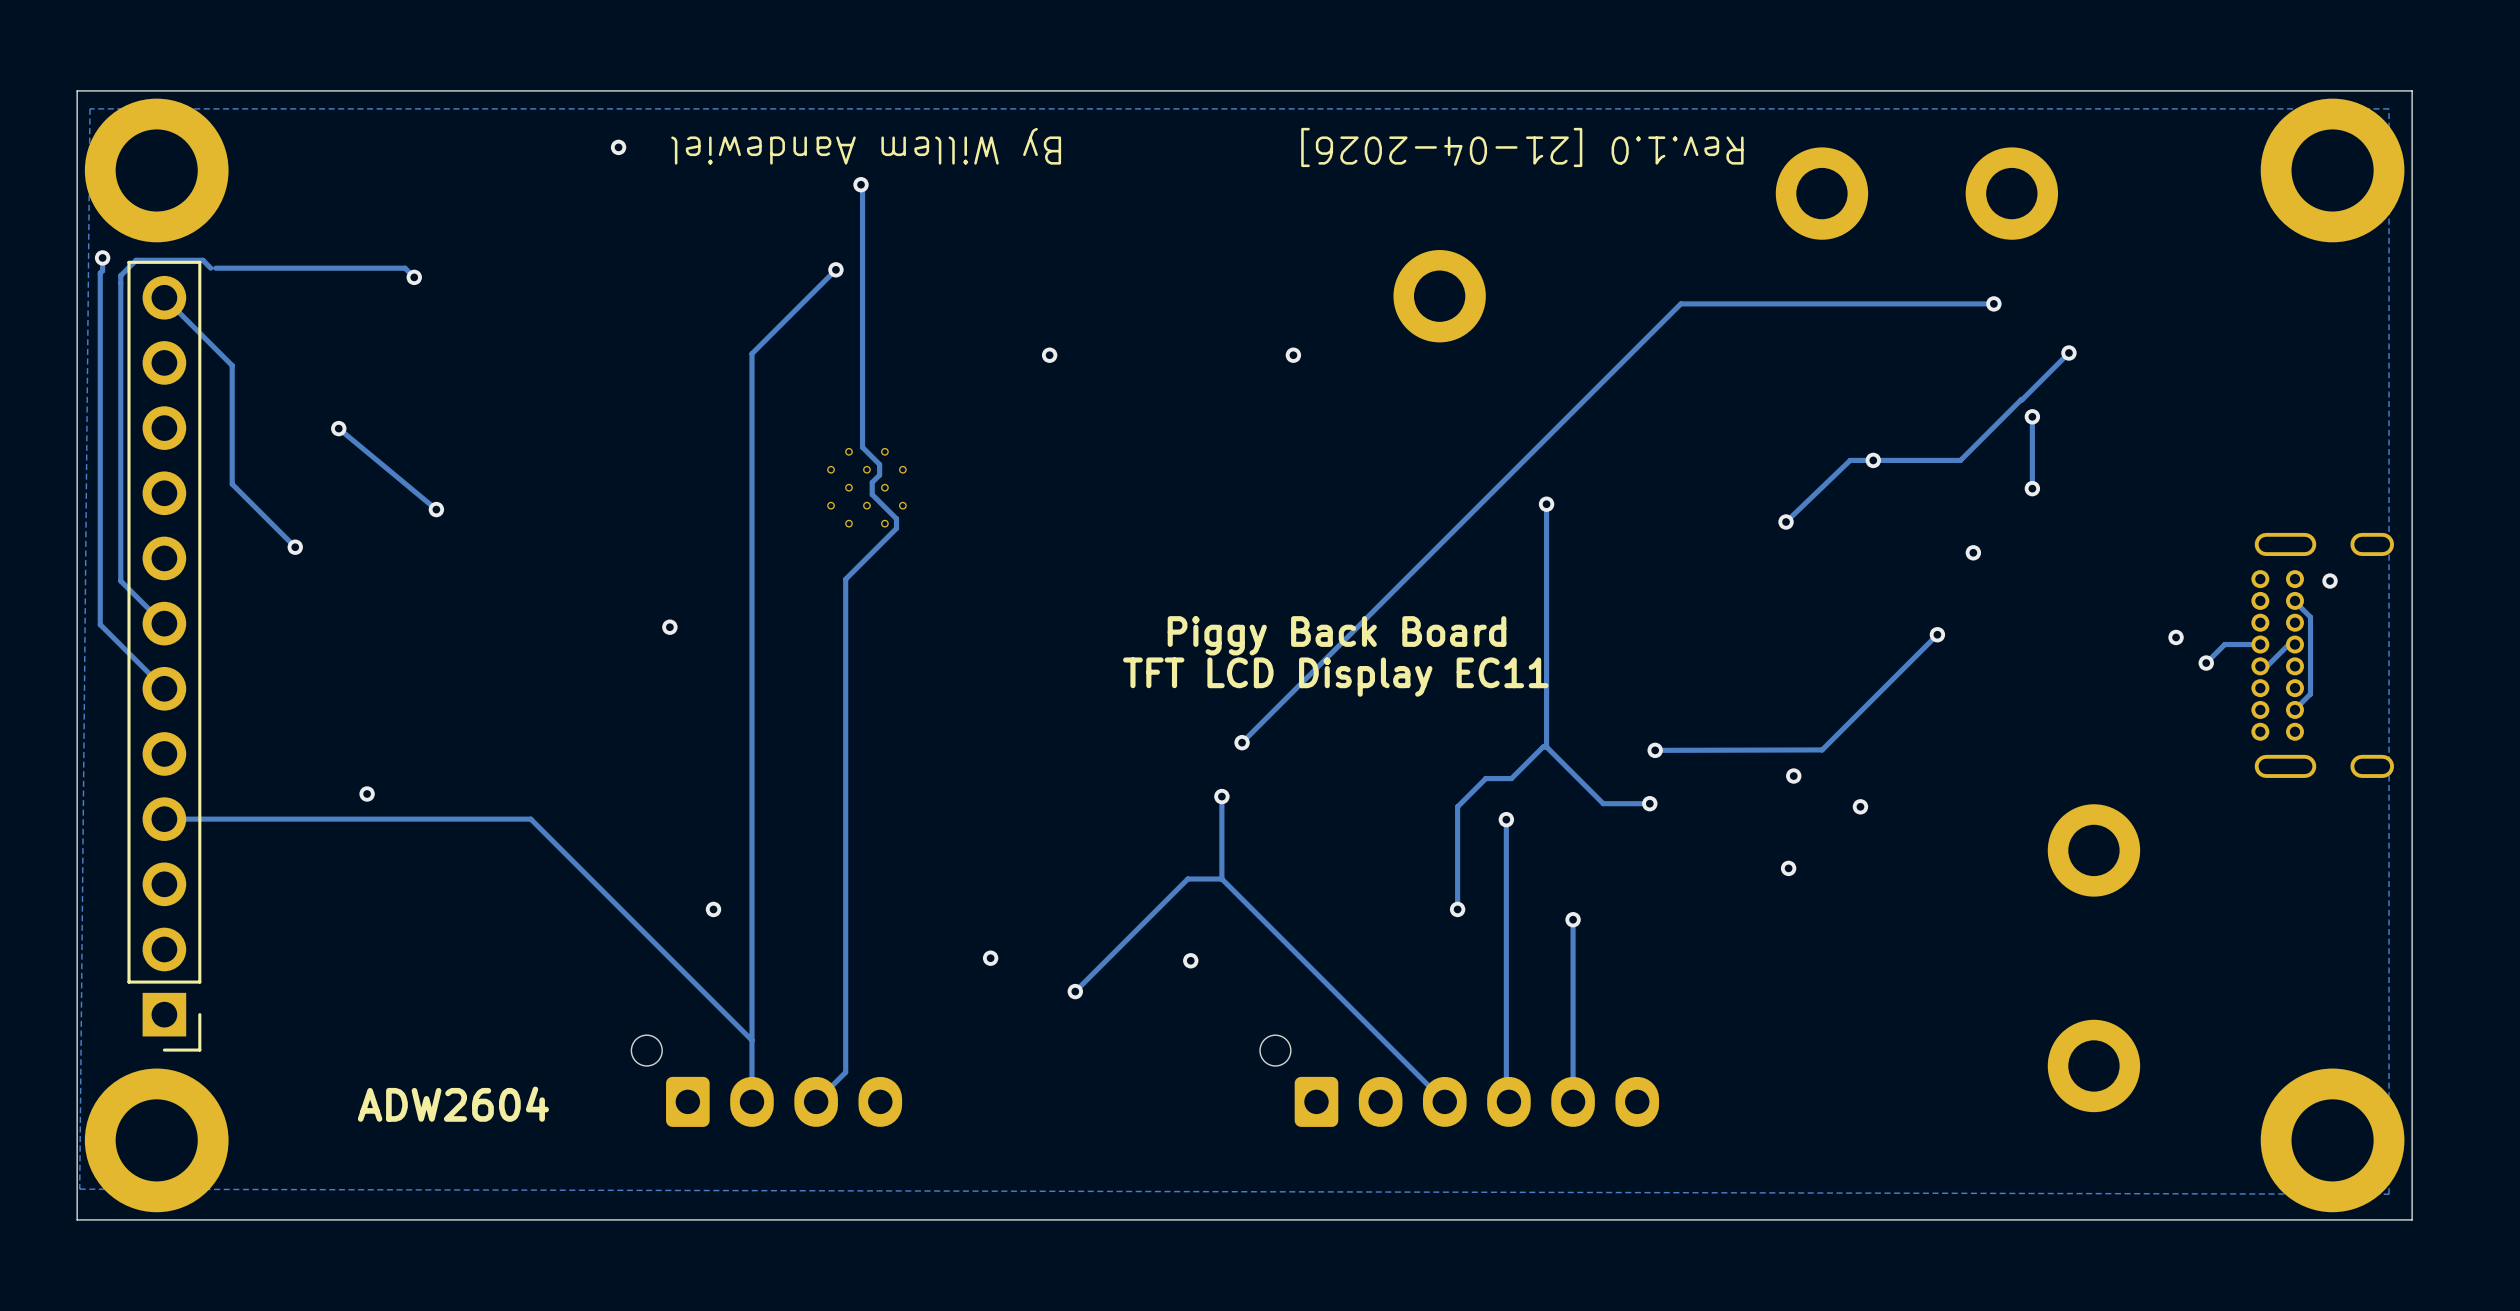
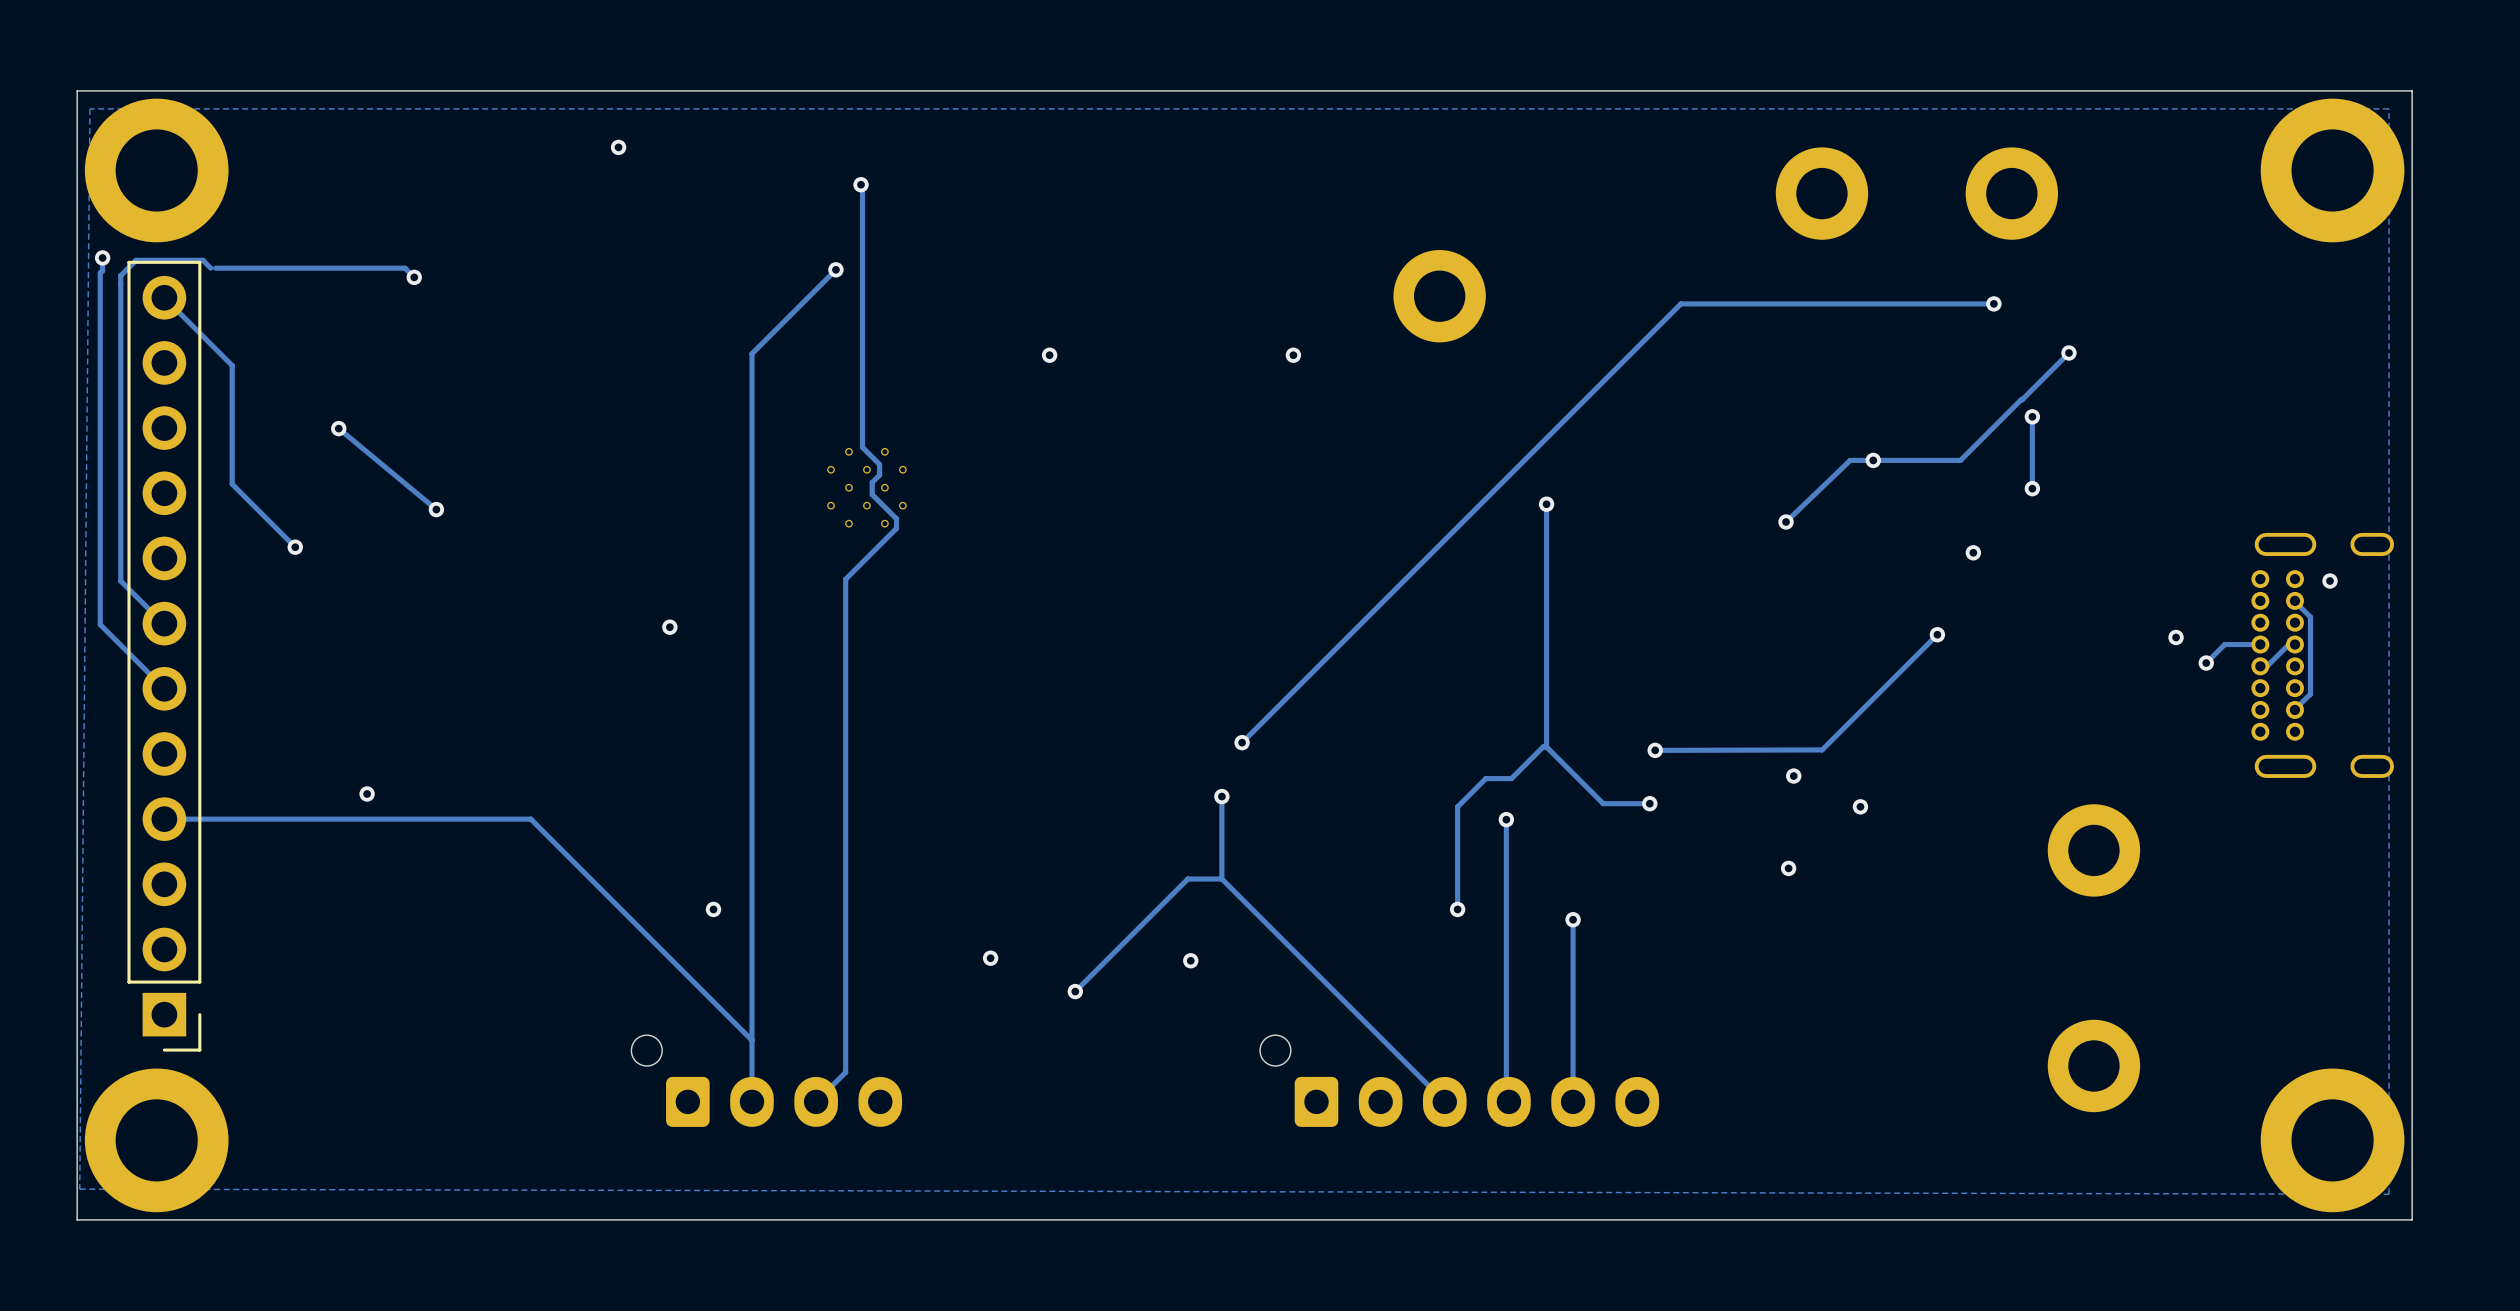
text: By Willem Aandewiel (866, 146) -> none
text: Rev.1.0 [21-04-2026] (1522, 147) -> none
text: Piggy Back Board (1337, 635) -> none
text: TFT LCD Display EC11 (1335, 677) -> none
text: ADW2604 (453, 1104) -> none

